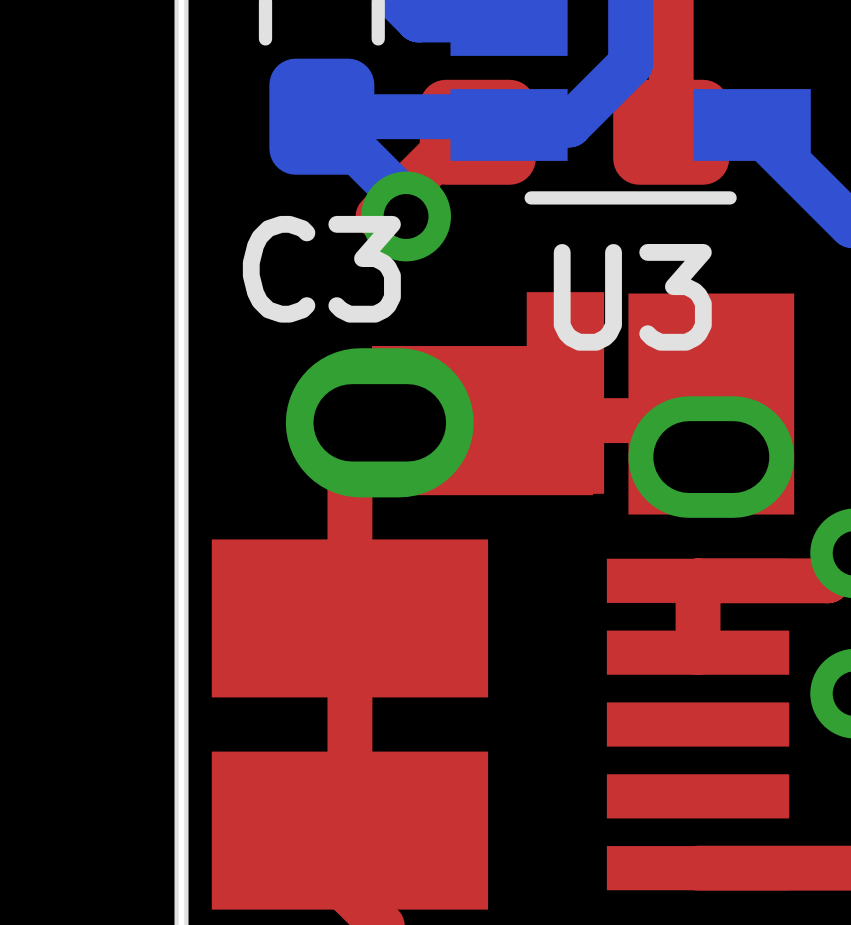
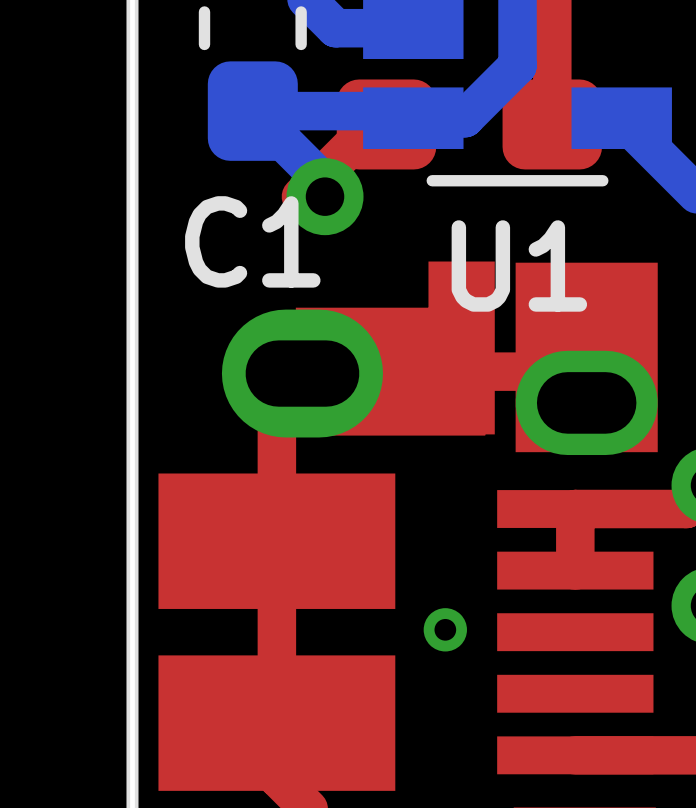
C3 name: C3 (321, 269) -> C1 (252, 241)
U3 name: U3 (632, 297) -> U1 (519, 265)
via: none -> (445, 629)

